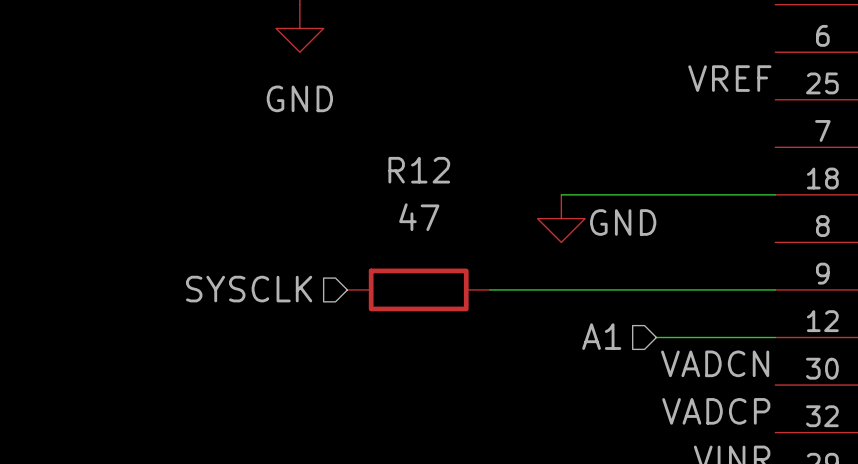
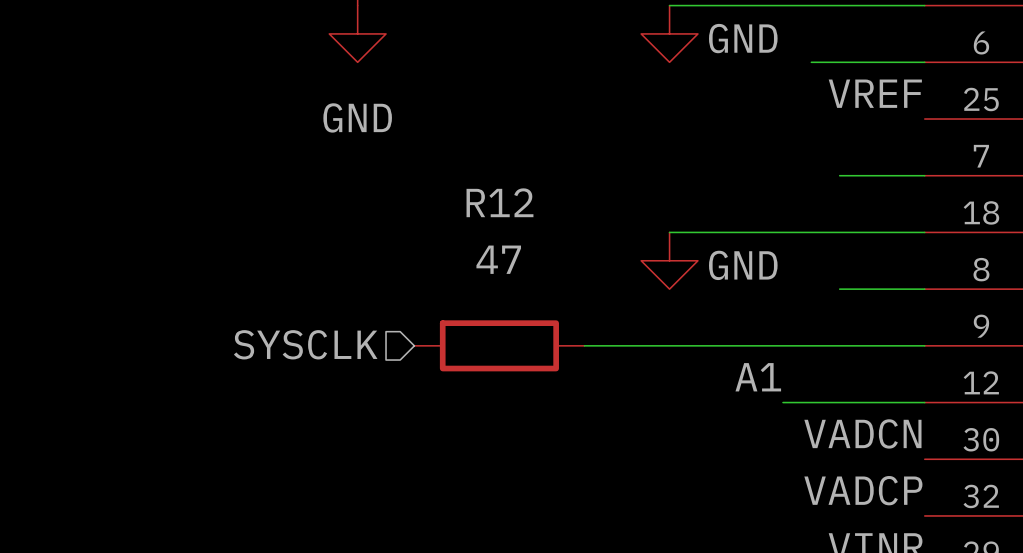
wire: none -> (669, 5) (924, 5)
power symbol: none -> GND (669, 33)
wire: none -> (811, 62) (924, 62)
wire: none -> (839, 175) (924, 175)
wire: none -> (839, 289) (924, 289)
label: none -> A1 (758, 377)
hierarchical label: A1 (601, 336) -> none

